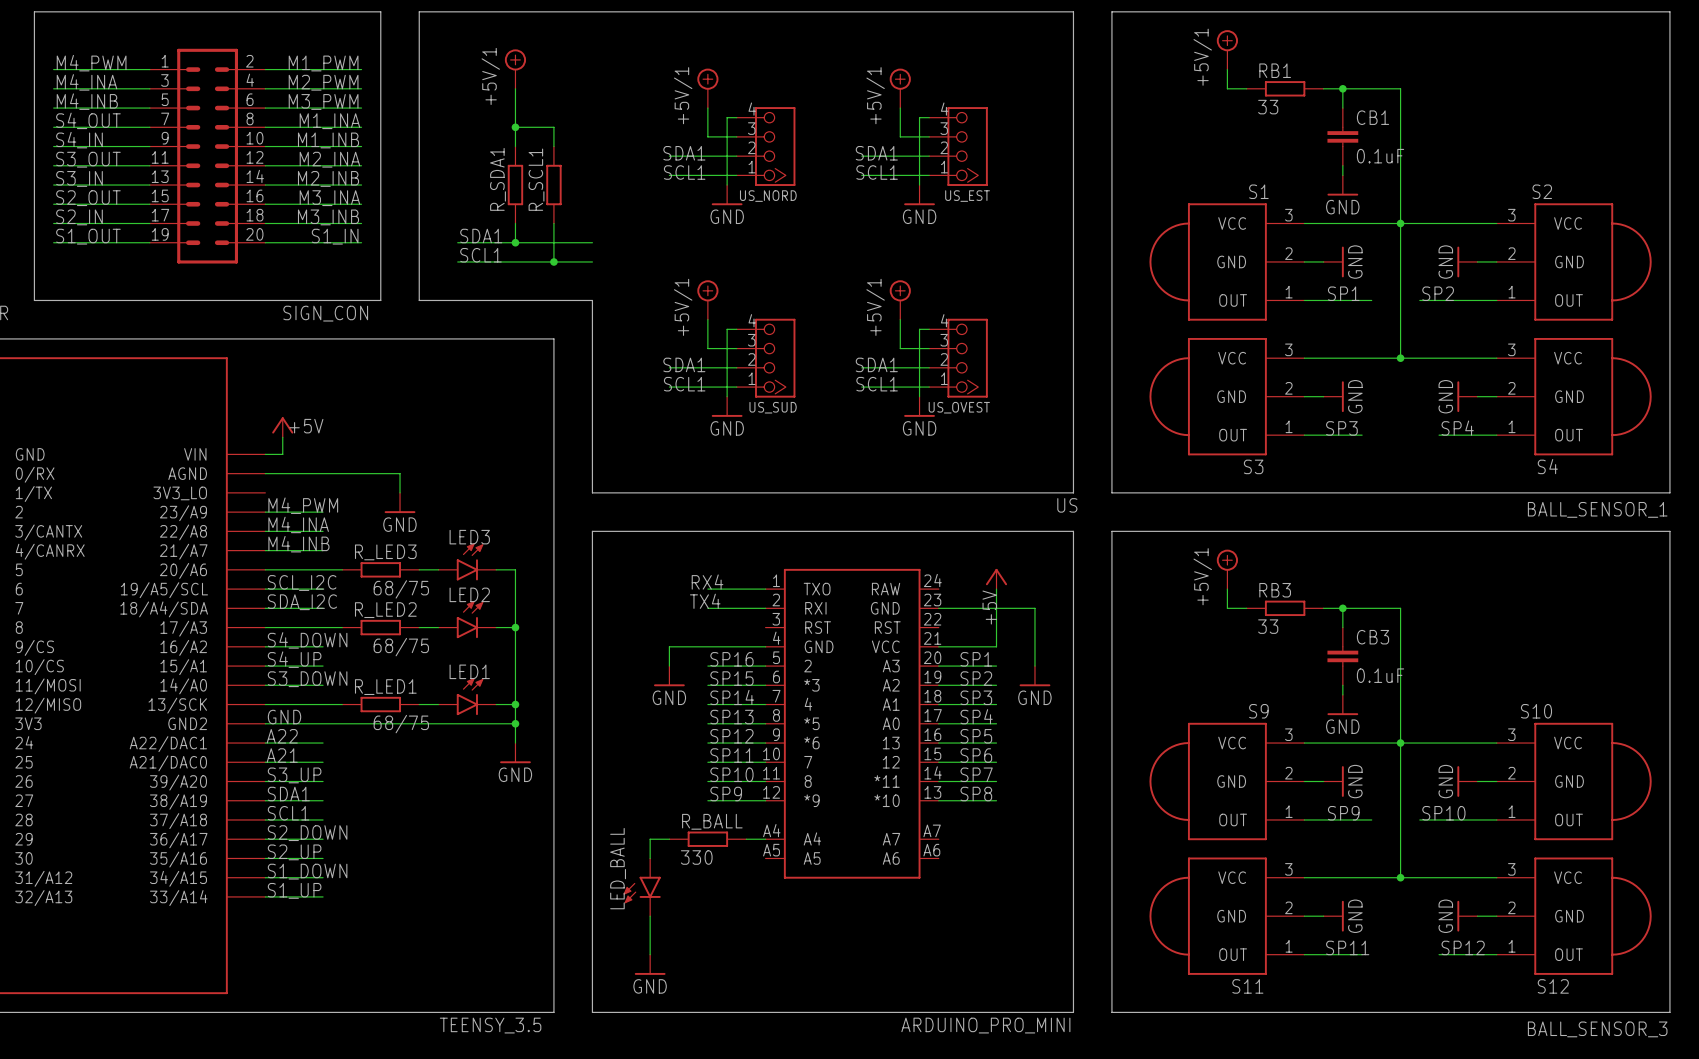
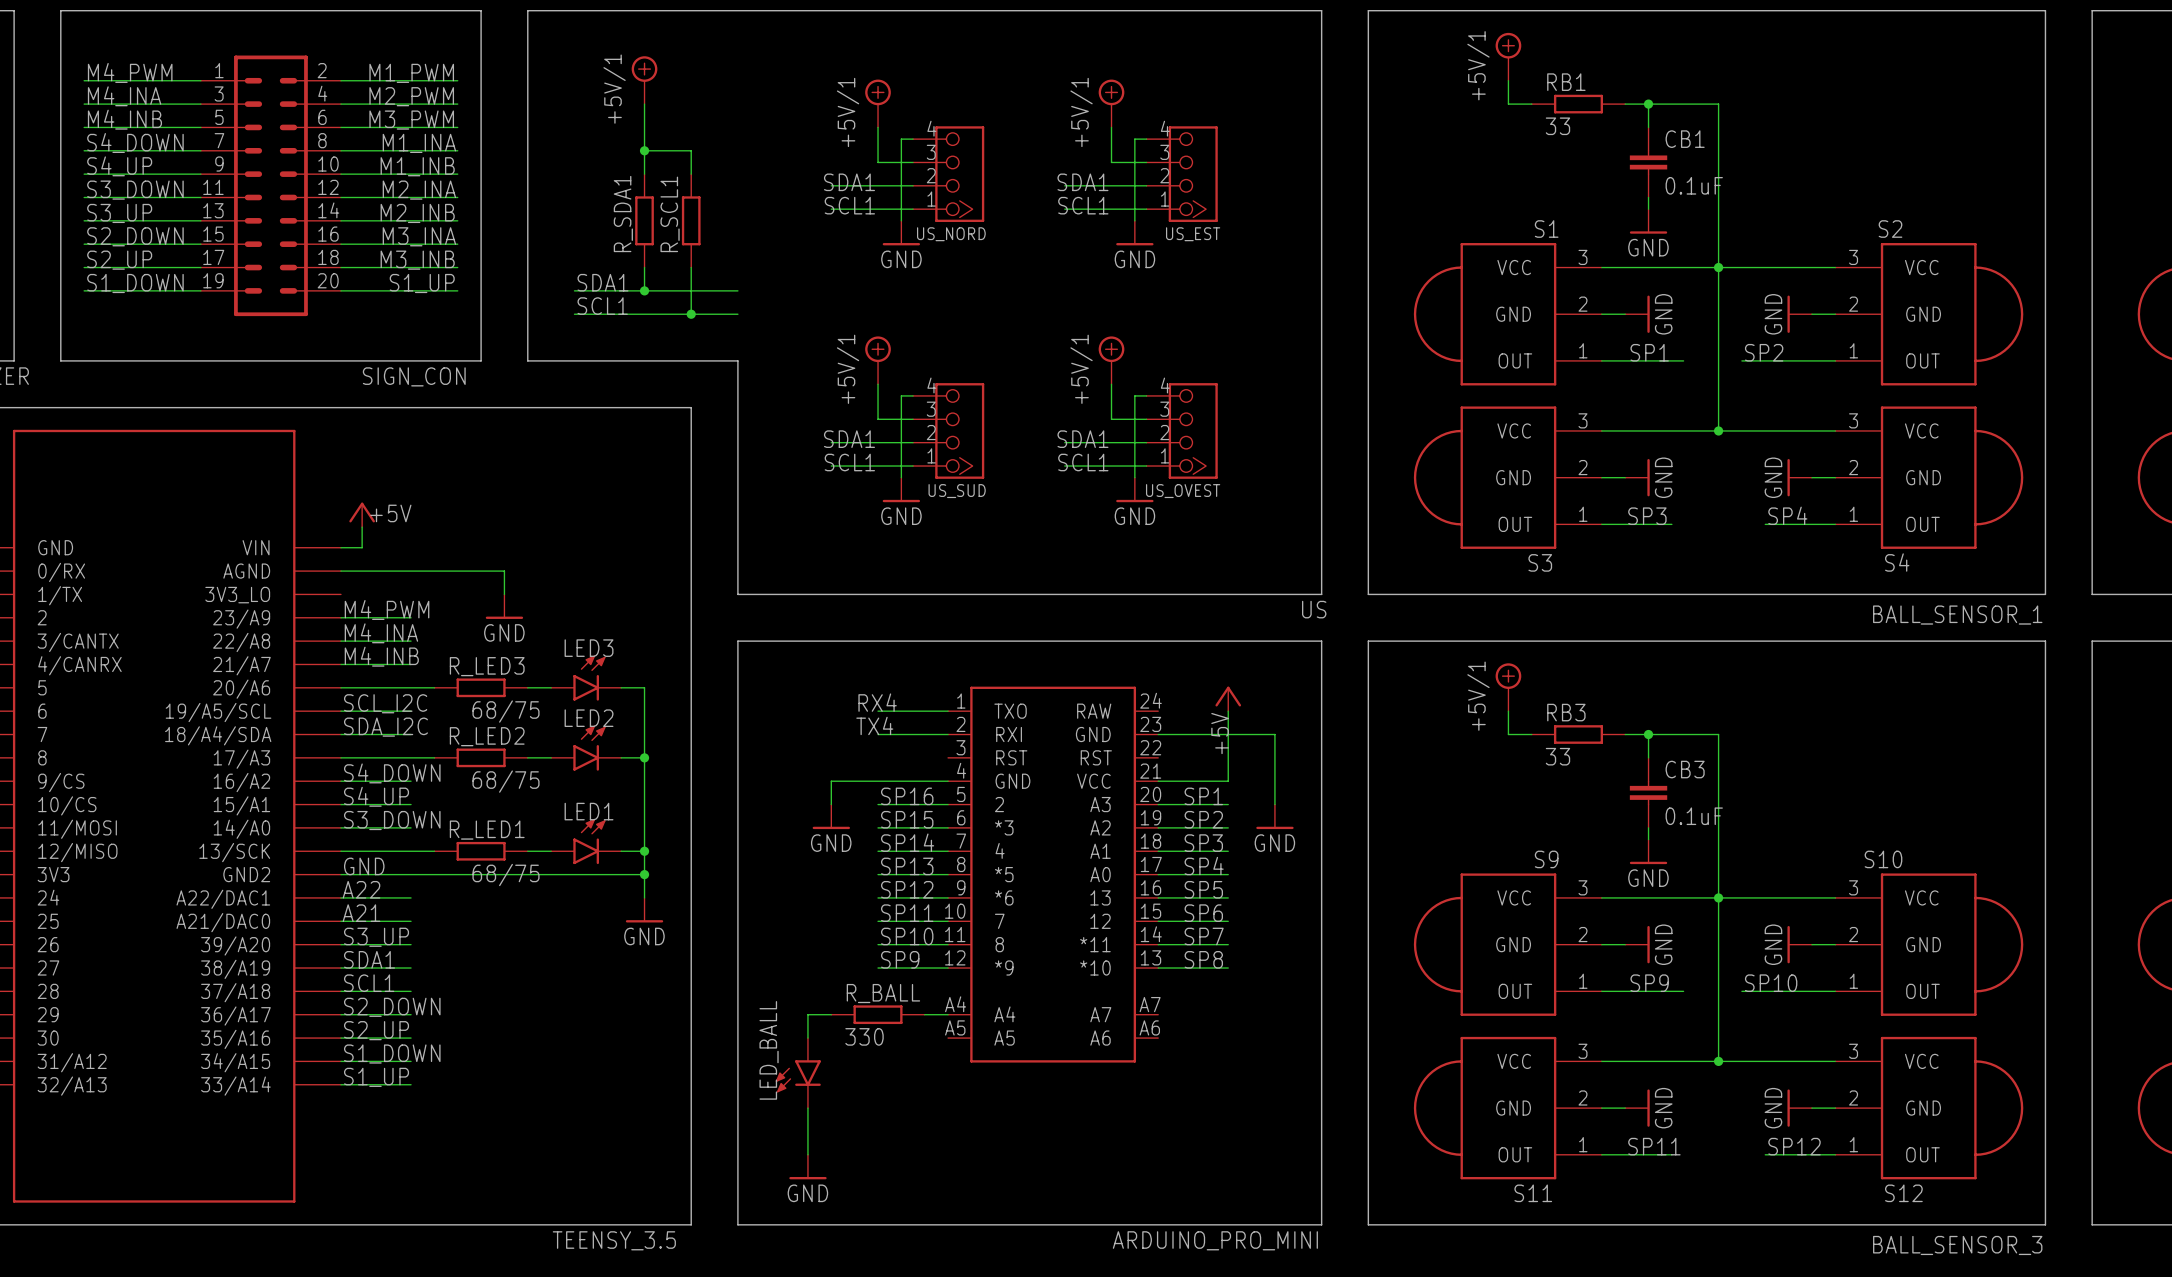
label: S4_OUT (88, 120) -> S4_DOWN (135, 143)
label: S4_IN (79, 140) -> S4_UP (119, 166)
label: S3_OUT (88, 159) -> S3_DOWN (135, 190)
label: S3_IN (79, 178) -> S3_UP (119, 213)
label: S2_OUT (88, 198) -> S2_DOWN (135, 236)
label: S2_IN (79, 217) -> S2_UP (119, 260)
label: S1_OUT (88, 236) -> S1_DOWN (135, 283)
label: S1_IN (335, 236) -> S1_UP (422, 283)

